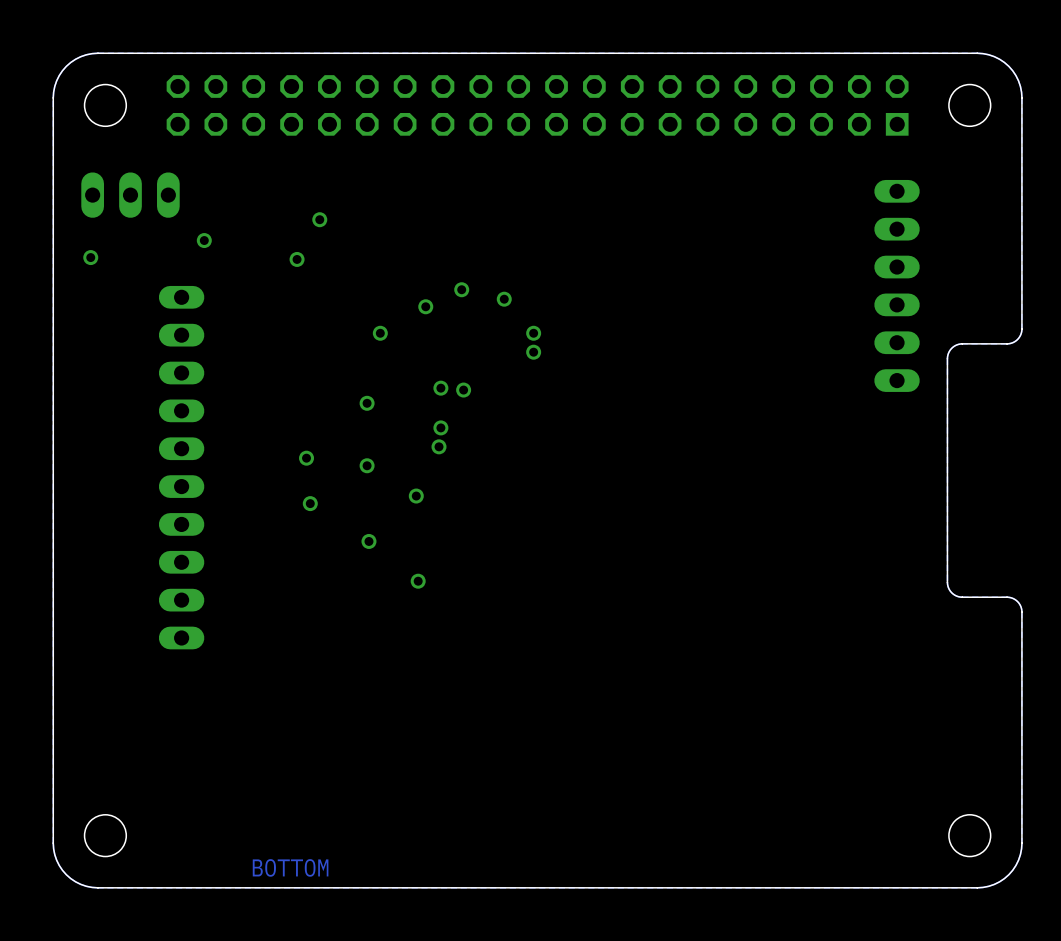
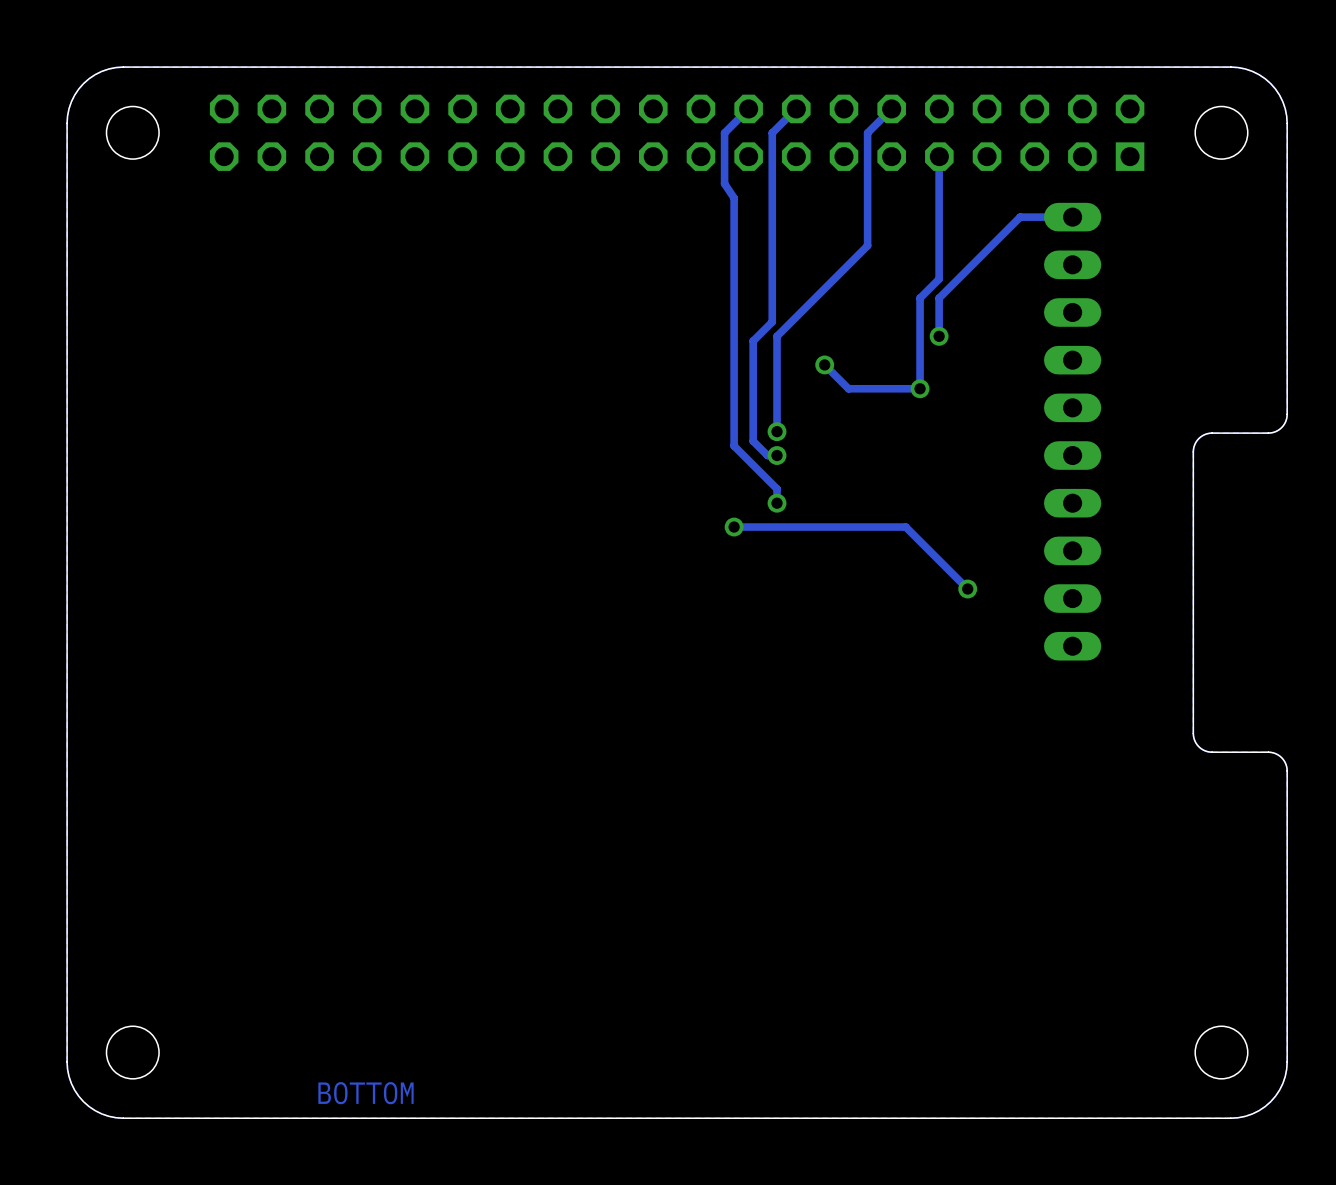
track: none -> (748, 108) (724, 133) (724, 183) (734, 198) (734, 445) (777, 488) (777, 503)
track: none -> (796, 108) (772, 133) (772, 322) (753, 341) (753, 441) (767, 455) (777, 455)
track: none -> (891, 108) (867, 133) (867, 245) (777, 336) (777, 431)
track: none -> (939, 156) (939, 279) (920, 298) (920, 388) (848, 388) (824, 364)
track: none -> (1072, 217) (1020, 217) (939, 298) (939, 336)
part: (130, 195) -> none
via: (319, 219) -> none
via: (204, 240) -> none
via: (90, 257) -> none
via: (297, 259) -> none
via: none -> (939, 336)
part: (897, 285) -> none
via: (461, 289) -> none
via: none -> (824, 364)
via: (504, 299) -> none
via: (425, 306) -> none
via: none -> (920, 388)
via: (380, 333) -> none
via: (533, 333) -> none
via: none -> (777, 431)
part: none -> (1072, 431)
via: (533, 352) -> none
via: none -> (777, 455)
via: (440, 388) -> none
via: (463, 390) -> none
via: none -> (777, 503)
via: (367, 403) -> none
track: none -> (734, 527) (905, 527) (967, 589)
via: none -> (734, 527)
via: (440, 427) -> none
via: (439, 446) -> none
via: (306, 458) -> none
via: (367, 465) -> none
part: (181, 467) -> none
via: none -> (967, 589)
via: (416, 496) -> none
via: (310, 503) -> none
via: (368, 541) -> none
via: (418, 581) -> none

